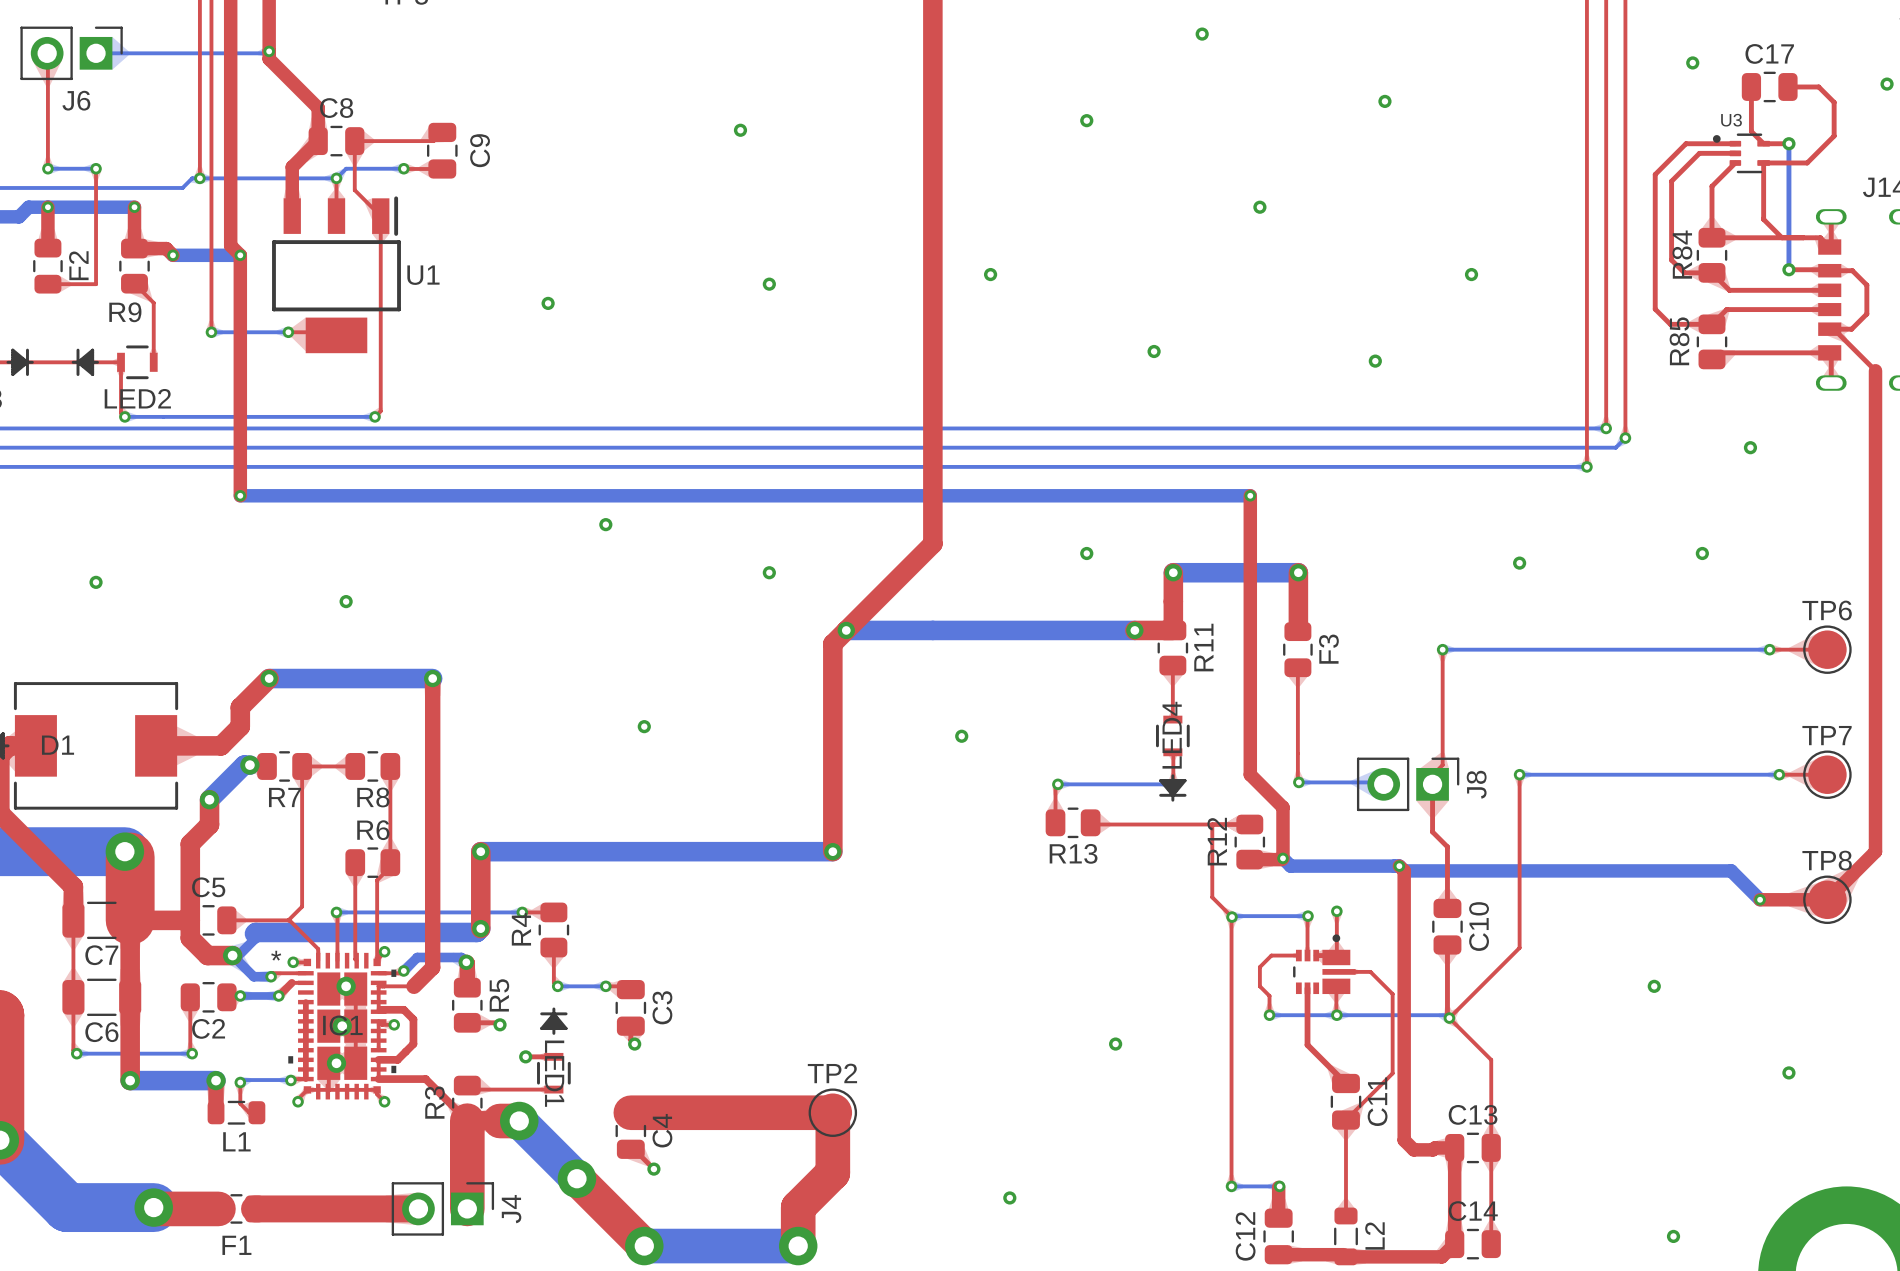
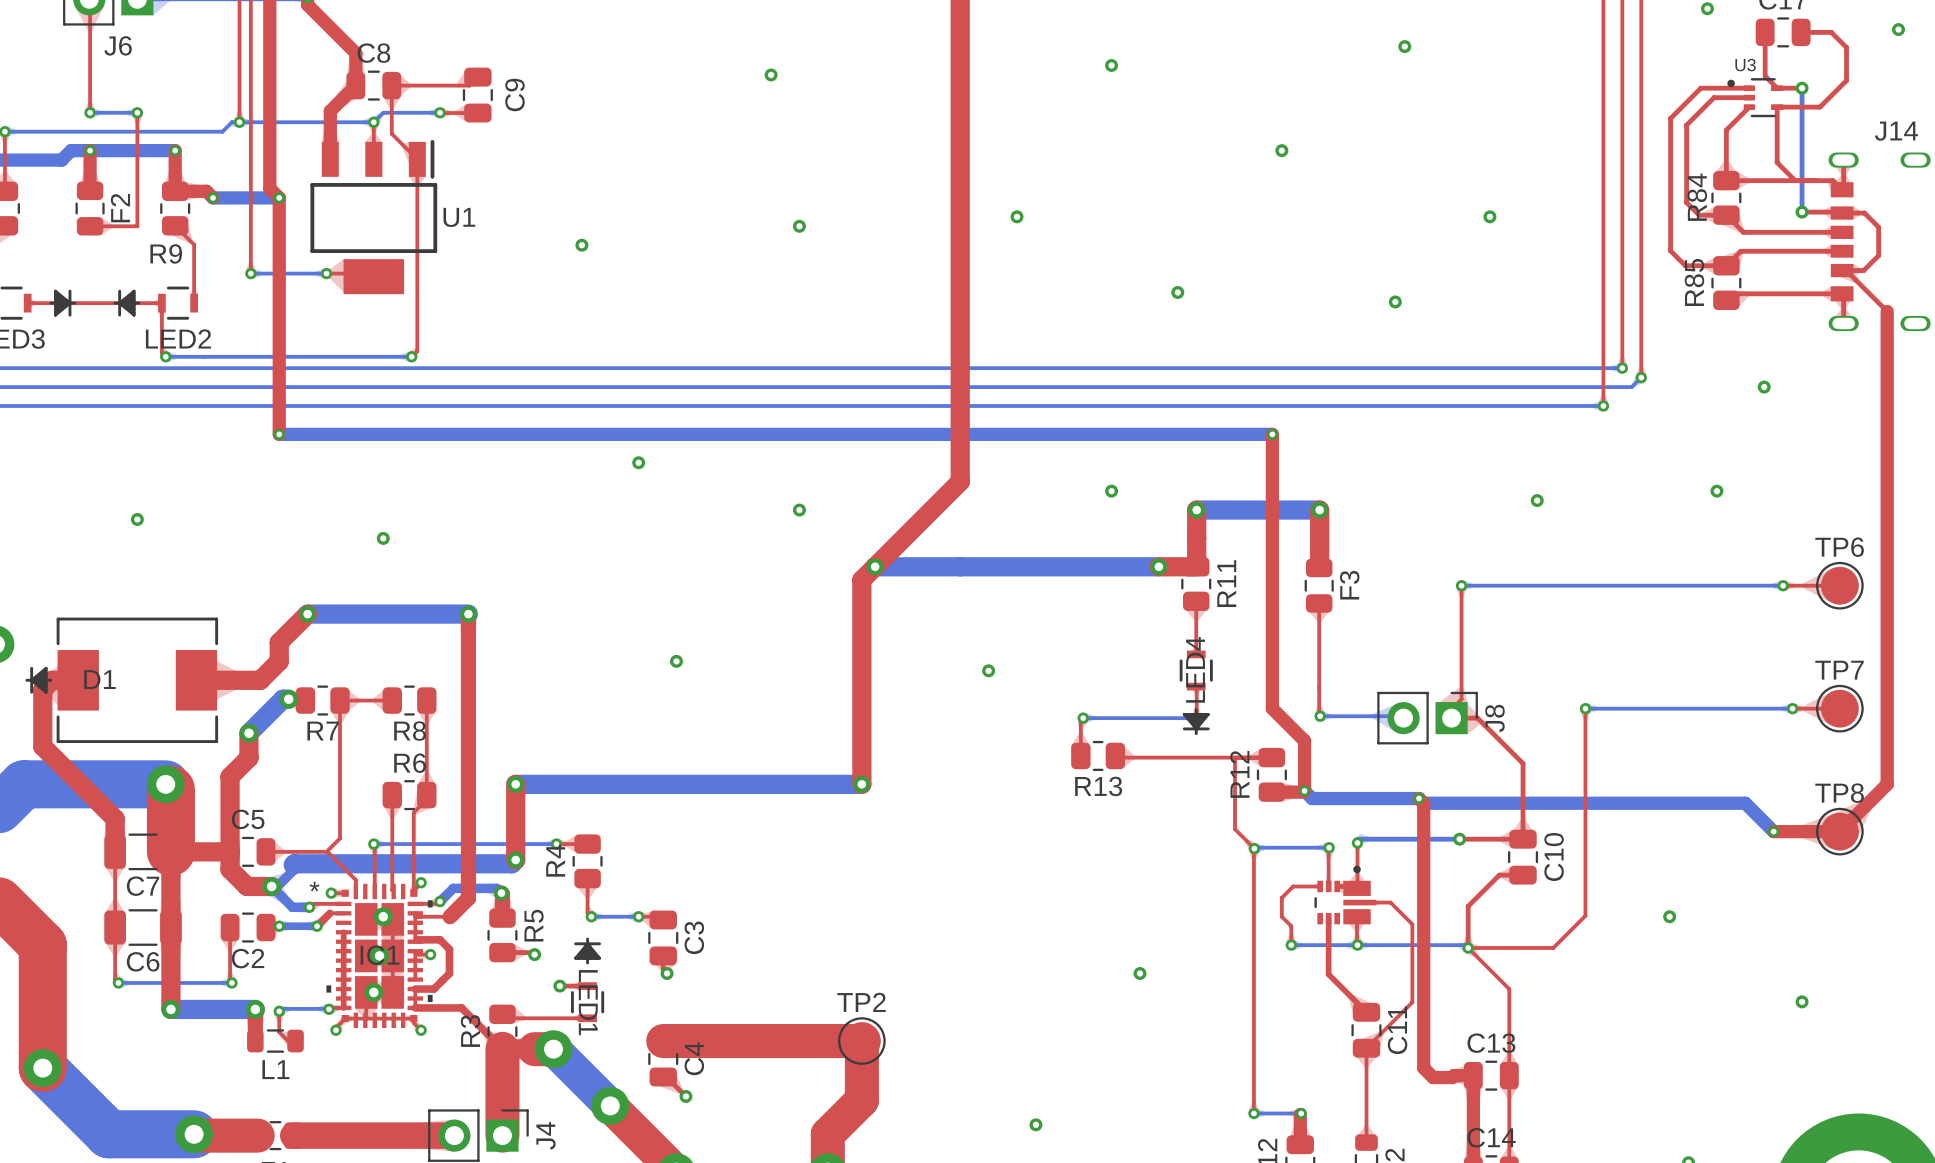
top track: (1519, 774) (1519, 947) (1449, 1018) (1447, 1016) (1447, 944) -> none
bottom track: (1519, 774) (1568, 774) -> none
via position: (1519, 774) -> (1585, 708)
top track: none -> (1585, 708) (1585, 915) (1553, 947) (1468, 947) (1468, 906) (1499, 875) (1523, 875)
top track: (1432, 784) (1432, 831) (1447, 846) (1447, 908) (1445, 906) -> (1451, 718) (1477, 718) (1523, 763) (1523, 839) (1459, 839)
bottom track: none -> (1357, 839) (1459, 839)
via: none -> (1459, 839)
C10 position: (1447, 926) -> (1523, 857)

